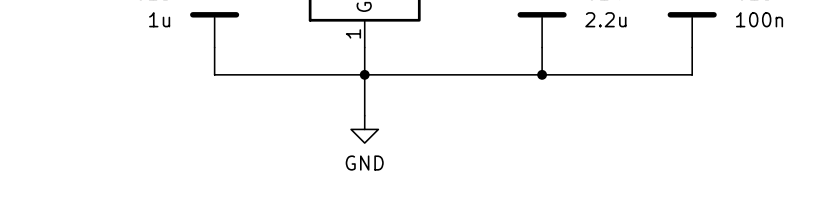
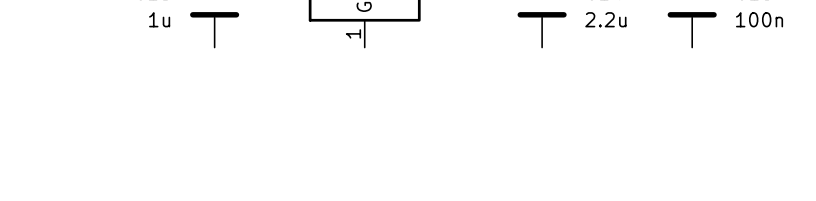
wire: (214, 47) (214, 74) (692, 74) (692, 47) -> none
wire: (364, 47) (364, 115) -> none
wire: (542, 47) (542, 74) -> none
junction: (364, 74) -> none
junction: (542, 74) -> none
power symbol: GND (364, 129) -> none

